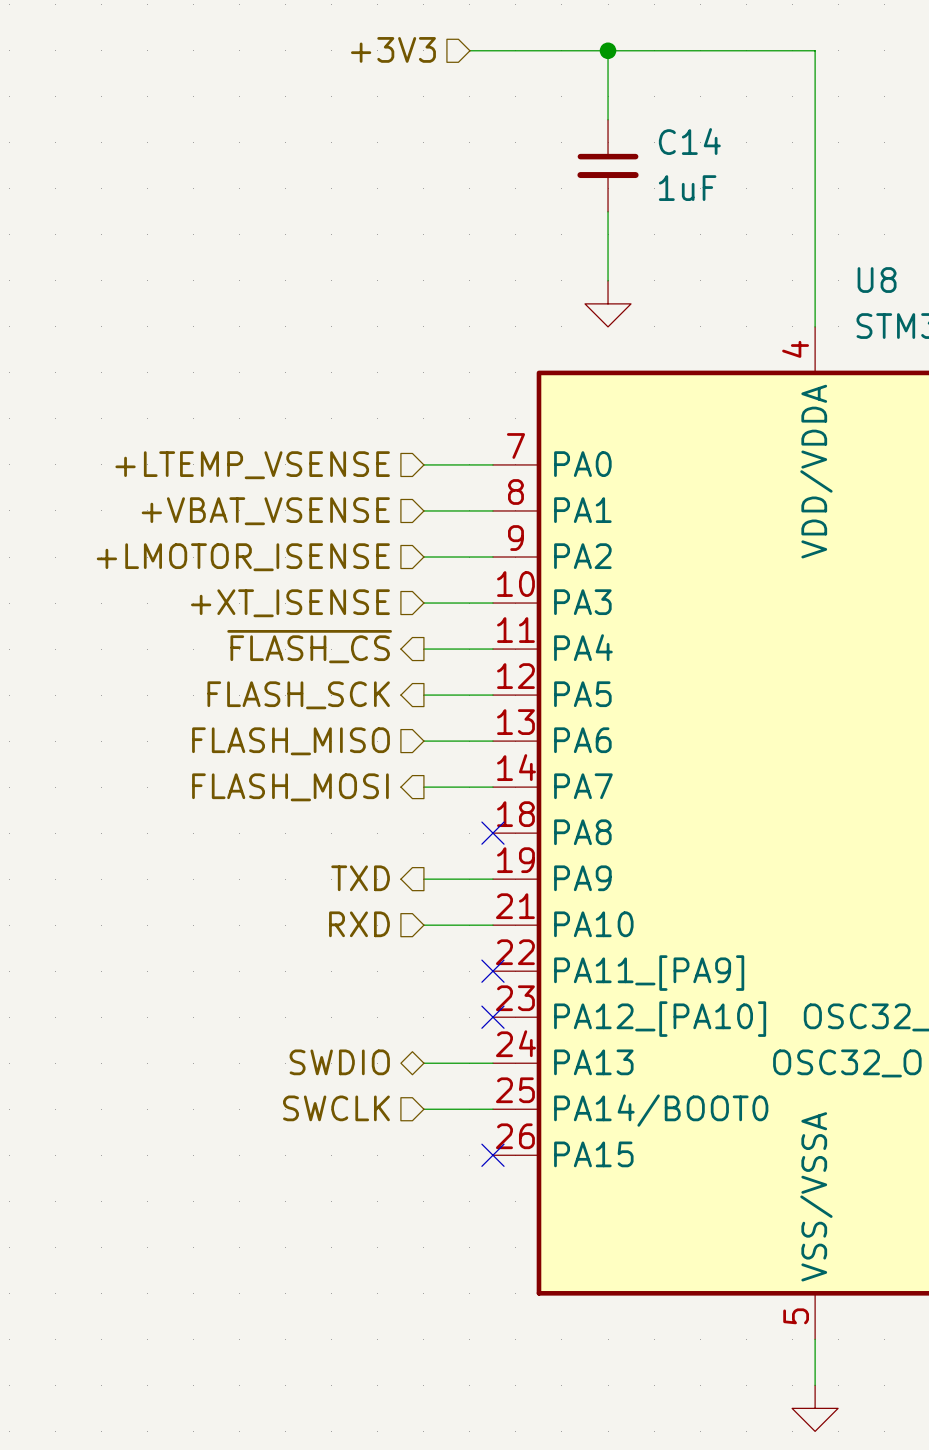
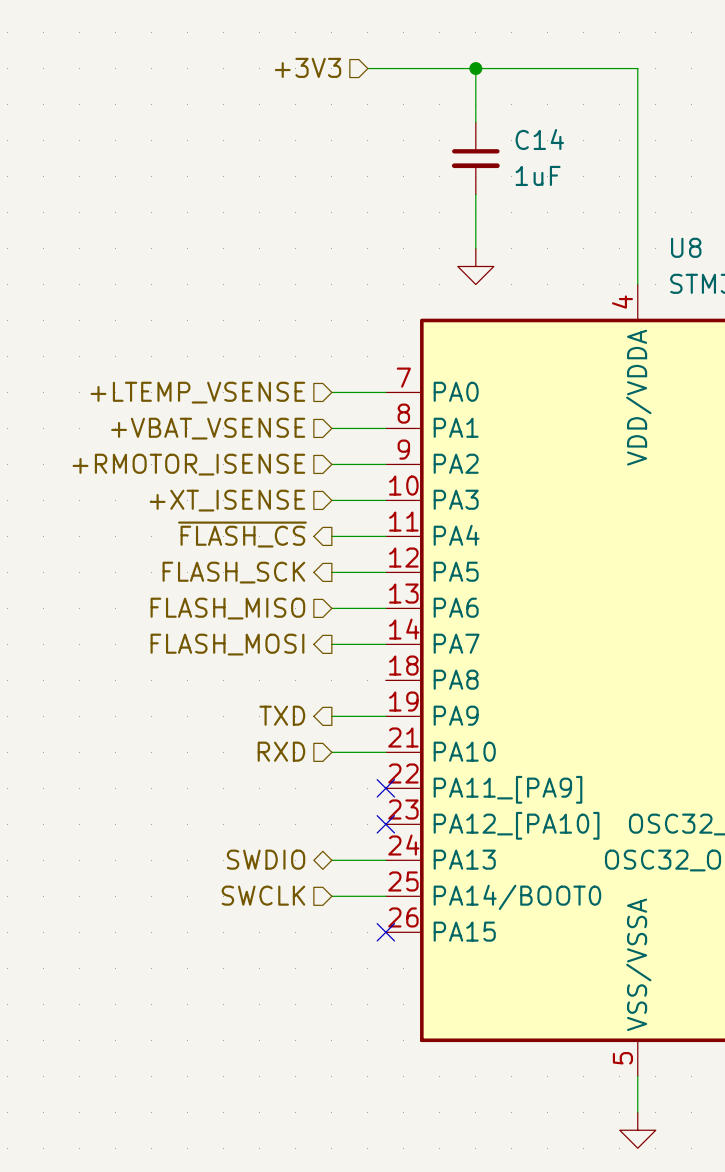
hierarchical label: +LMOTOR_ISENSE (243, 557) -> +RMOTOR_ISENSE (188, 464)
no-connect mark: (492, 833) -> none

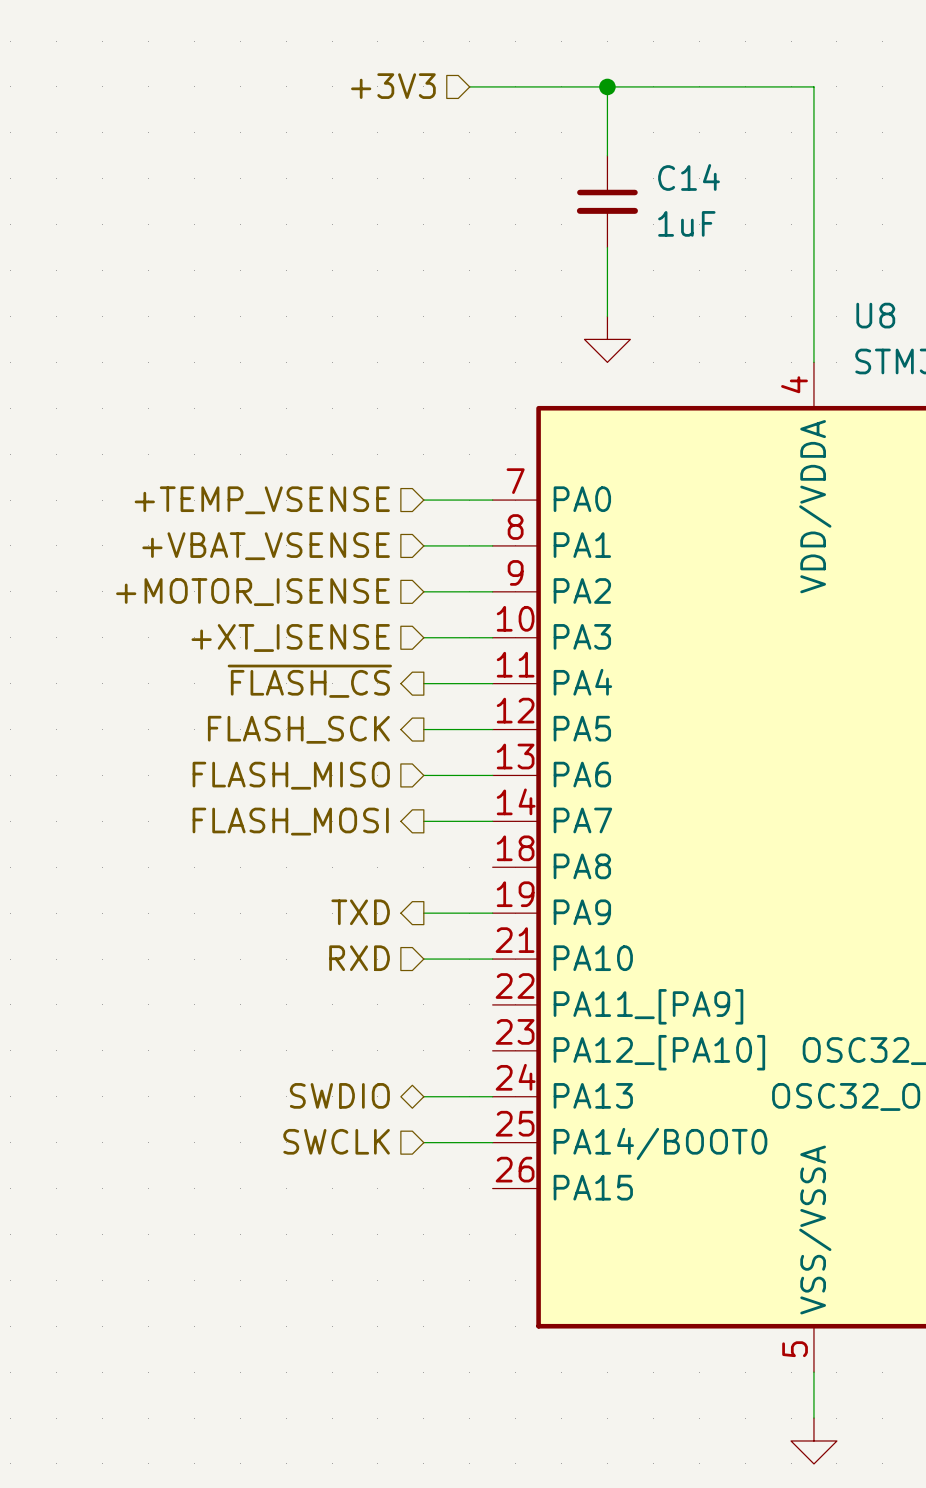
hierarchical label: +LTEMP_VSENSE (197, 392) -> +TEMP_VSENSE (262, 500)
hierarchical label: +RMOTOR_ISENSE (188, 464) -> +MOTOR_ISENSE (252, 592)
no-connect mark: (385, 788) -> none
no-connect mark: (385, 824) -> none
no-connect mark: (385, 932) -> none

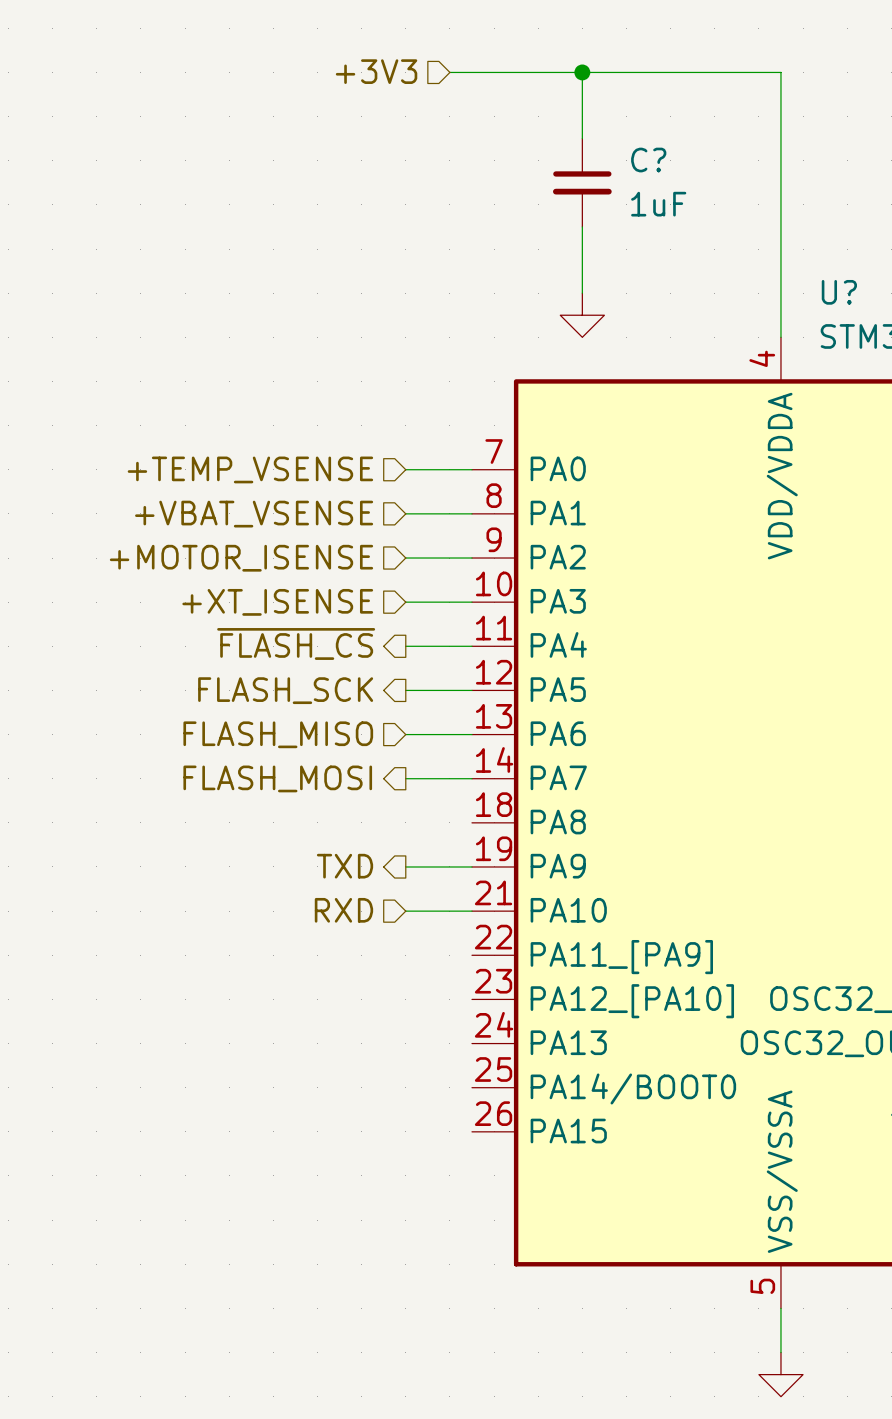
C14 name: C14 (689, 177) -> C? (648, 160)
U8 name: U8 (875, 315) -> U? (839, 292)
hierarchical label: SWDIO (339, 1095) -> none
wire: (423, 1096) (492, 1096) -> none
hierarchical label: SWCLK (336, 1141) -> none
wire: (423, 1142) (492, 1142) -> none

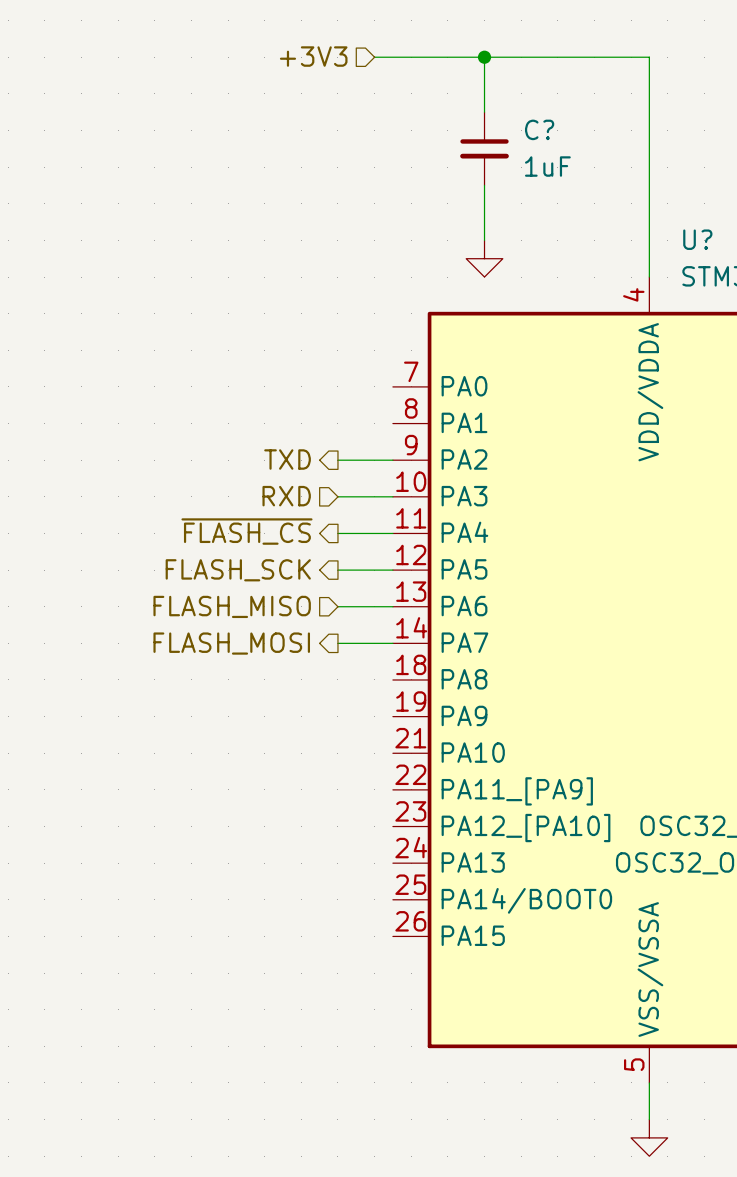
hierarchical label: +TEMP_VSENSE (250, 469) -> none
wire: (405, 469) (471, 469) -> none
wire: (405, 513) (471, 513) -> none
hierarchical label: +VBAT_VSENSE (254, 514) -> none
hierarchical label shape: input (241, 558) -> output (287, 459)
hierarchical label: +MOTOR_ISENSE (241, 558) -> TXD (287, 459)
hierarchical label: +XT_ISENSE (277, 602) -> RXD (286, 496)
hierarchical label: TXD (345, 866) -> none
wire: (405, 866) (471, 866) -> none
hierarchical label: RXD (343, 910) -> none
wire: (405, 911) (471, 911) -> none

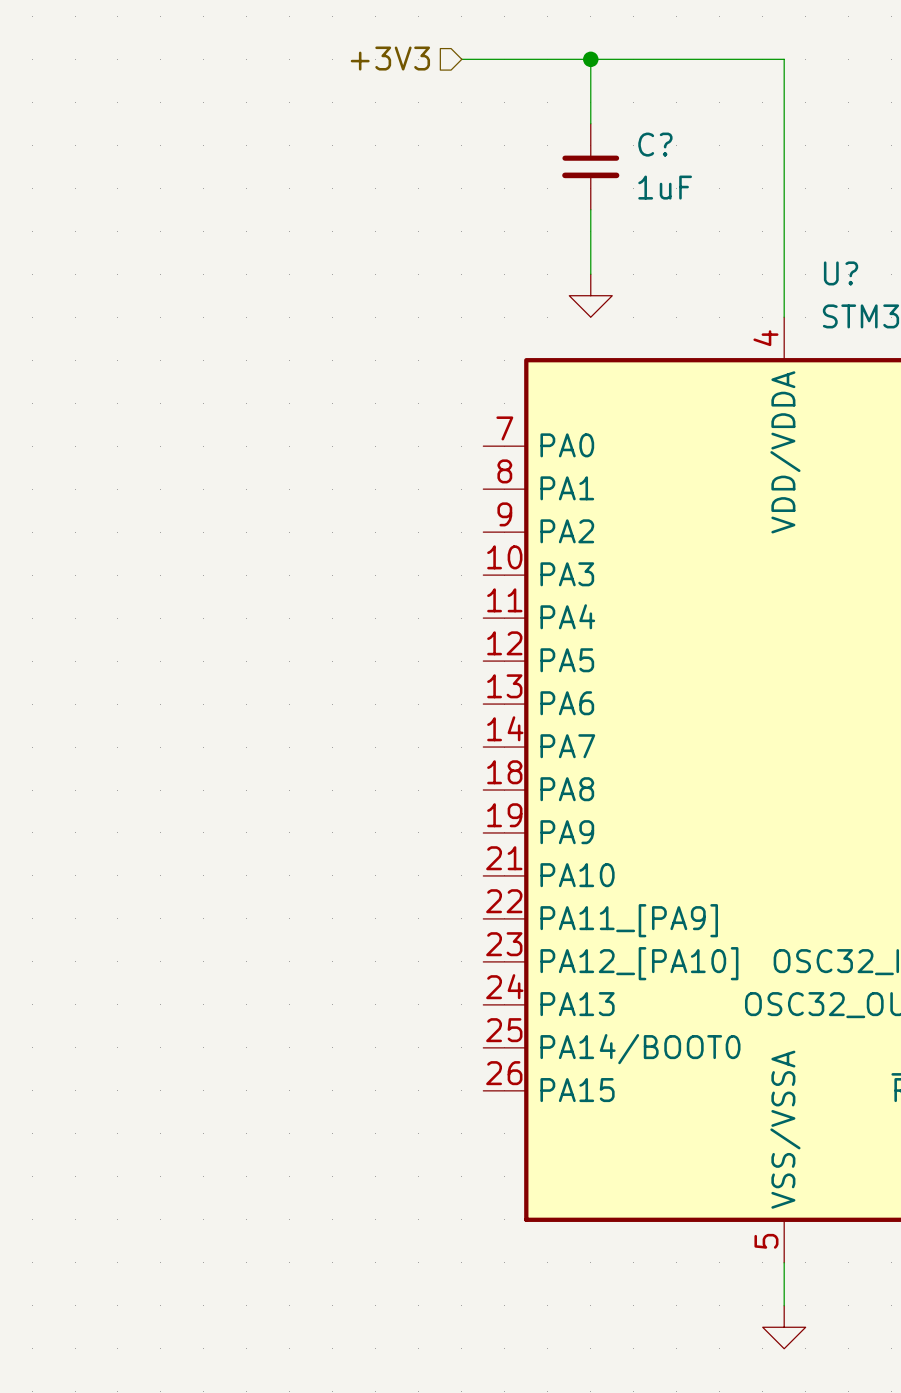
hierarchical label: TXD (287, 459) -> none
wire: (337, 460) (392, 460) -> none
hierarchical label: RXD (286, 496) -> none
wire: (337, 496) (392, 496) -> none
hierarchical label: ~{FLASH_CS} (246, 531) -> none
wire: (337, 533) (392, 533) -> none
hierarchical label: FLASH_SCK (238, 570) -> none
wire: (337, 570) (392, 570) -> none
hierarchical label: FLASH_MISO (232, 606) -> none
wire: (337, 606) (392, 606) -> none
hierarchical label: FLASH_MOSI (231, 643) -> none
wire: (337, 643) (392, 643) -> none

